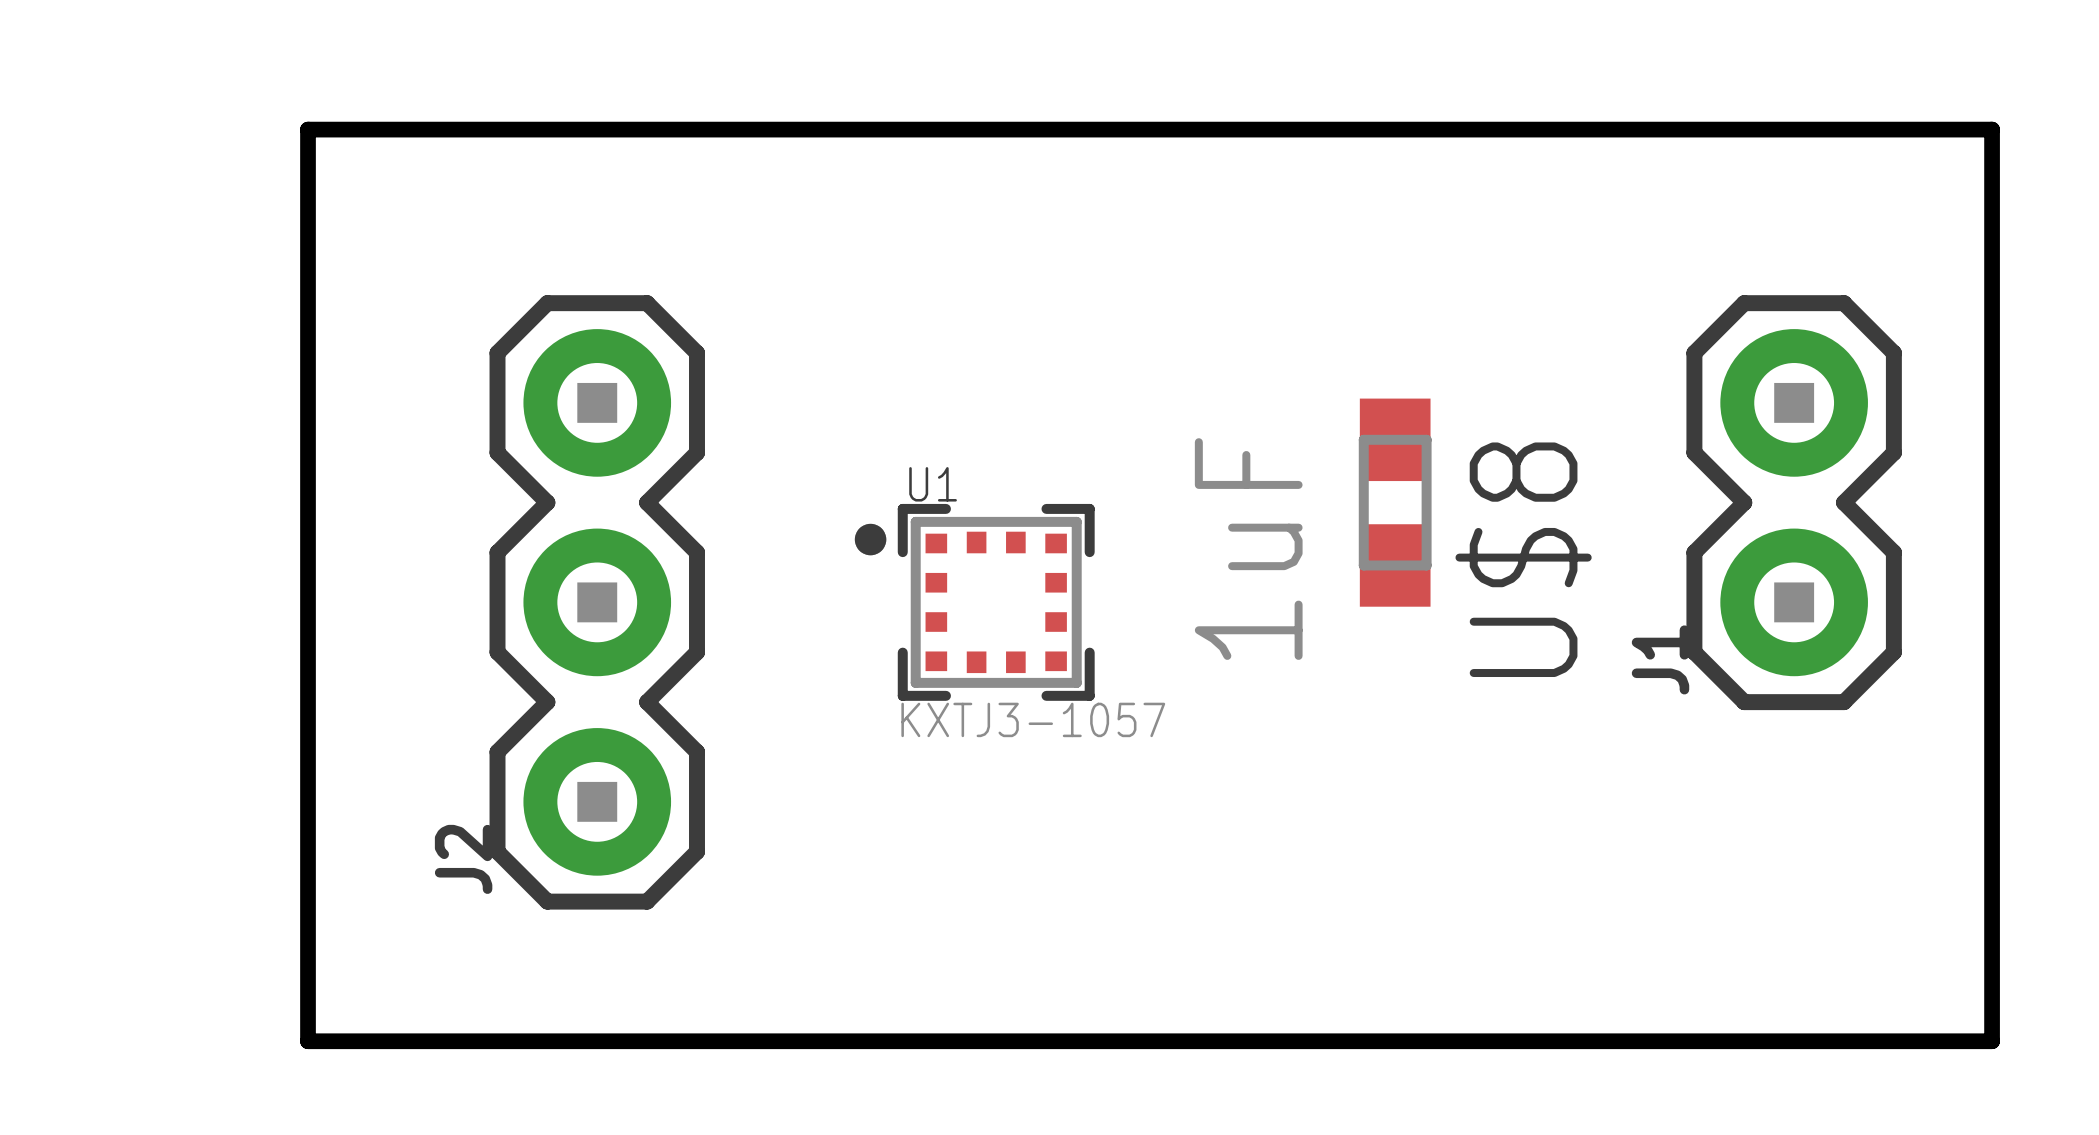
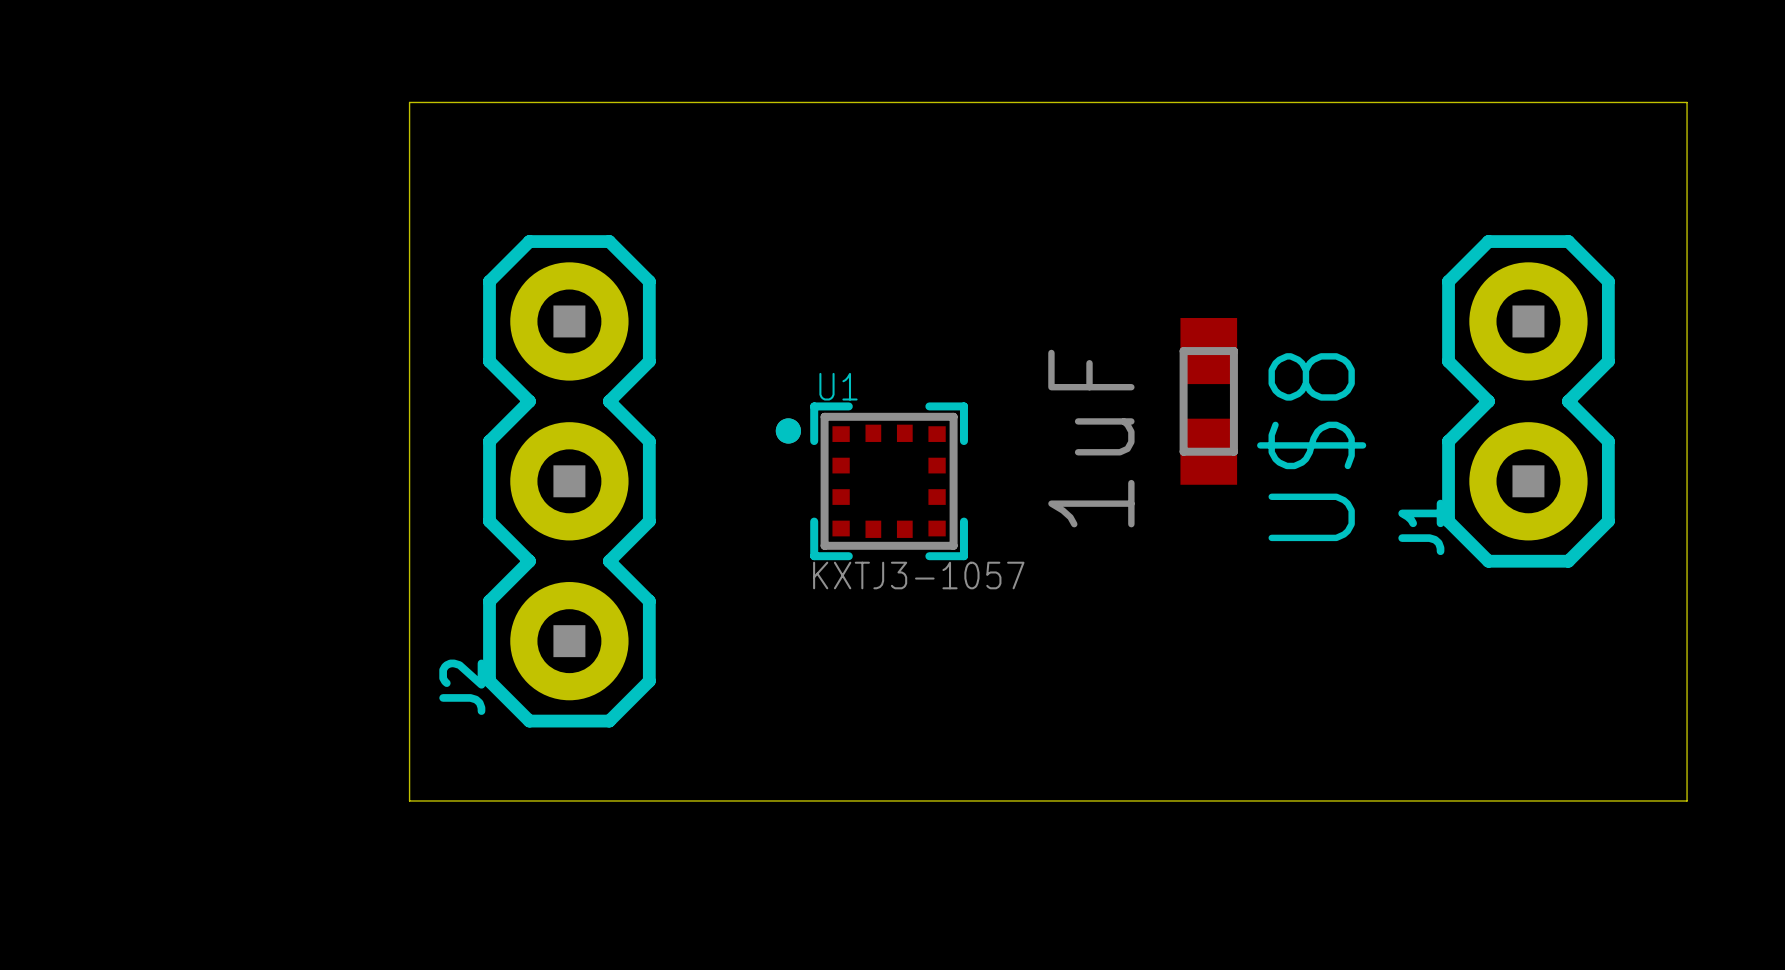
board edge: (397, 129) (308, 129) (308, 1041) (1992, 1041) (1992, 1001) -> (409, 102) (409, 800) (1687, 800)
board edge width: thick (397, 129) (1992, 129) (1992, 1001) -> thin (409, 102) (1687, 102) (1687, 800)

